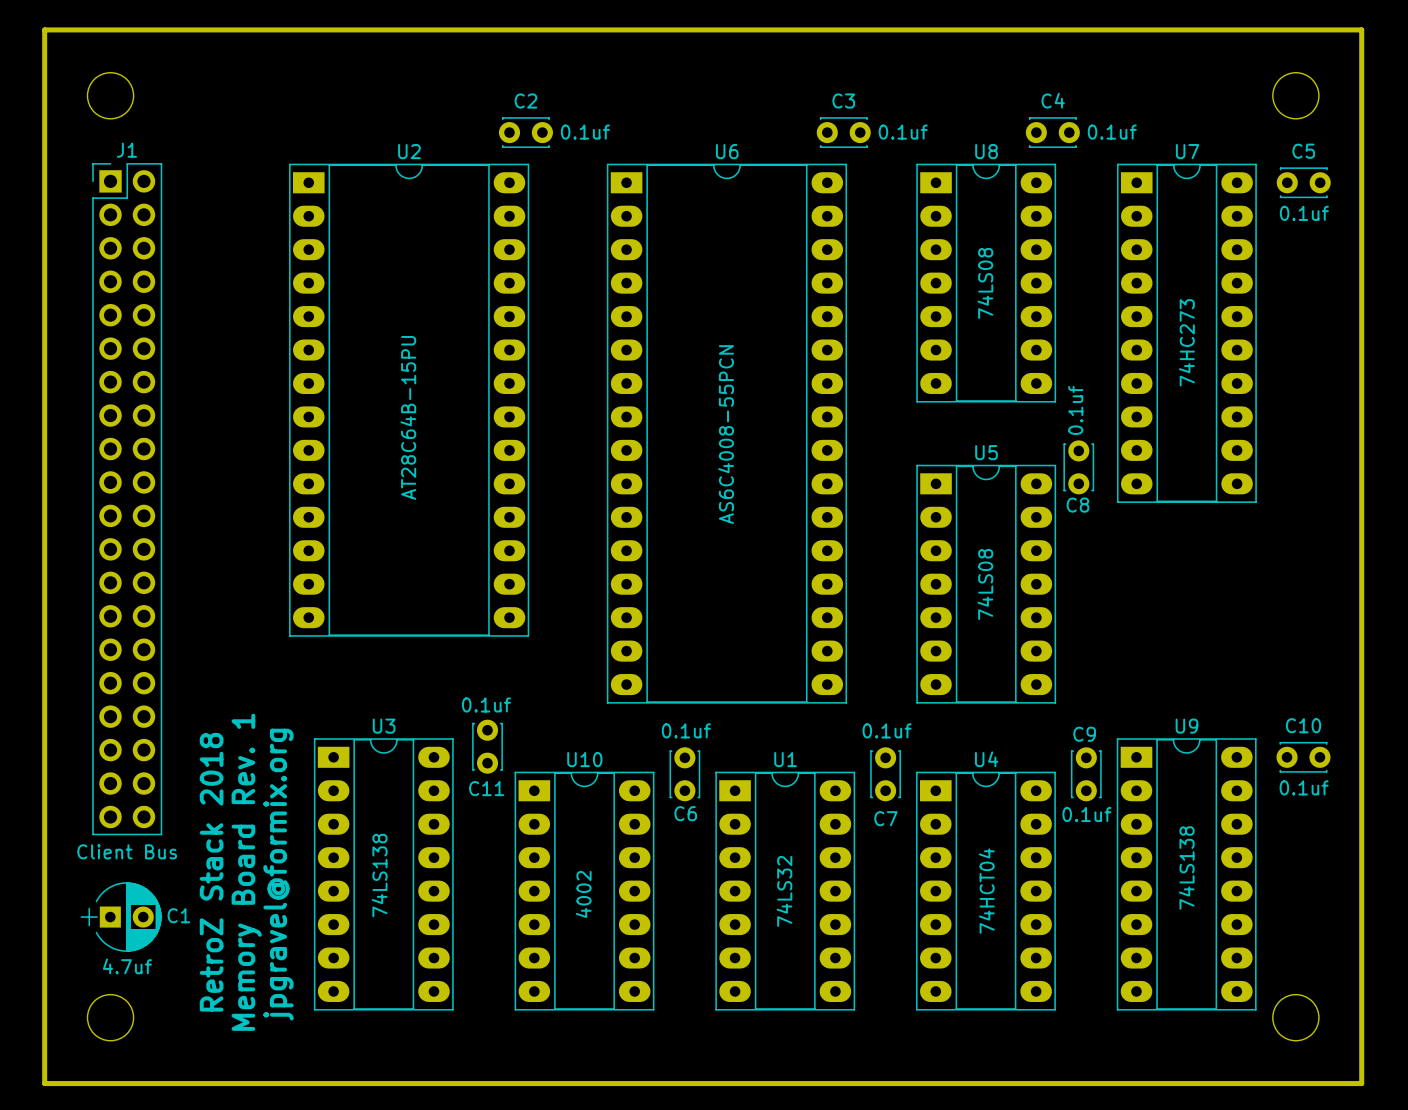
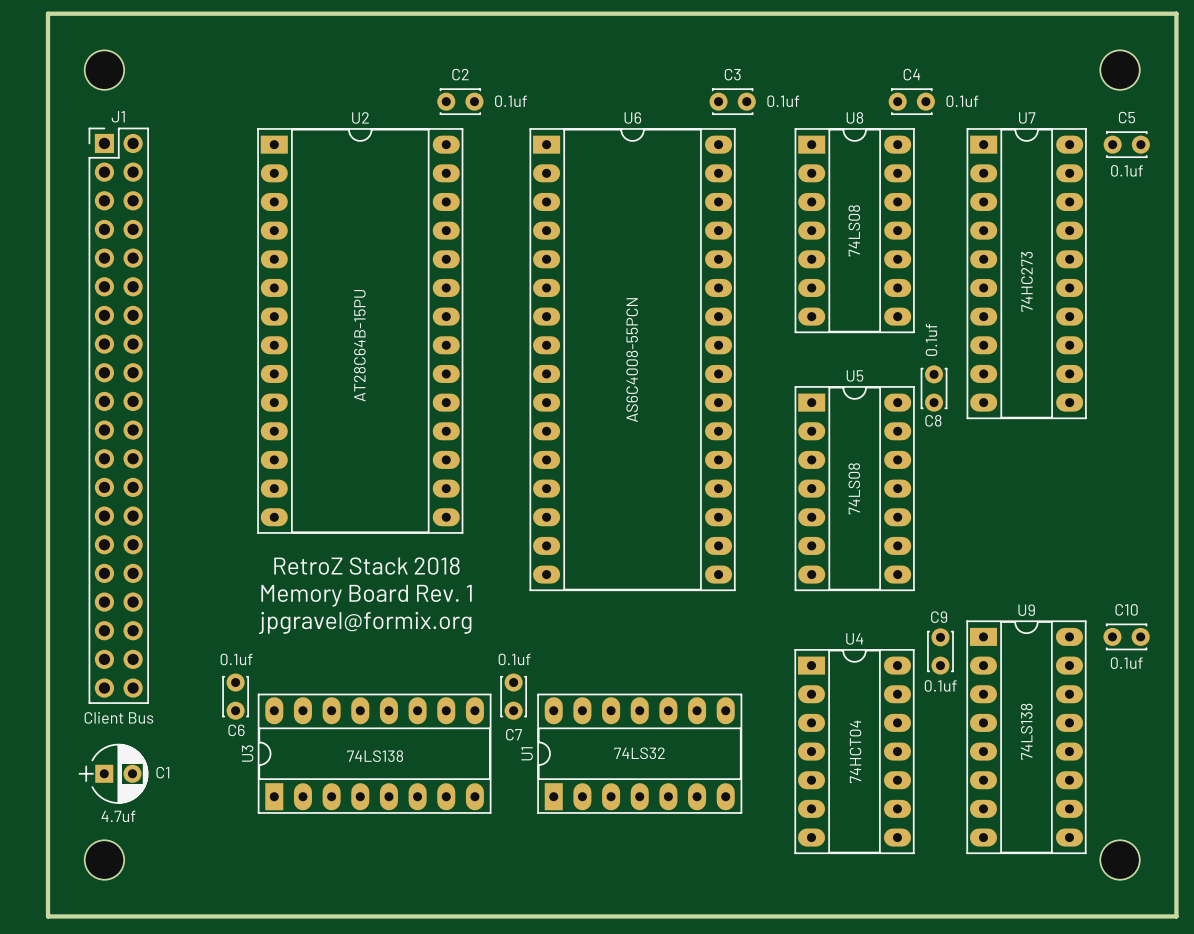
C11: 0.1uf (487, 746) -> none
C6 position: (684, 774) -> (235, 696)
C7 position: (885, 774) -> (513, 696)
text rotation: 0° (211, 872) -> 90° clockwise (366, 566)
text rotation: 0° (246, 872) -> 90° clockwise (366, 595)
text rotation: 0° (278, 874) -> 90° clockwise (365, 622)
U3 rotation: 0° (383, 874) -> 90° counterclockwise (374, 753)
U10: 4002 (584, 891) -> none
U1 rotation: 0° (785, 891) -> 90° counterclockwise (639, 753)

